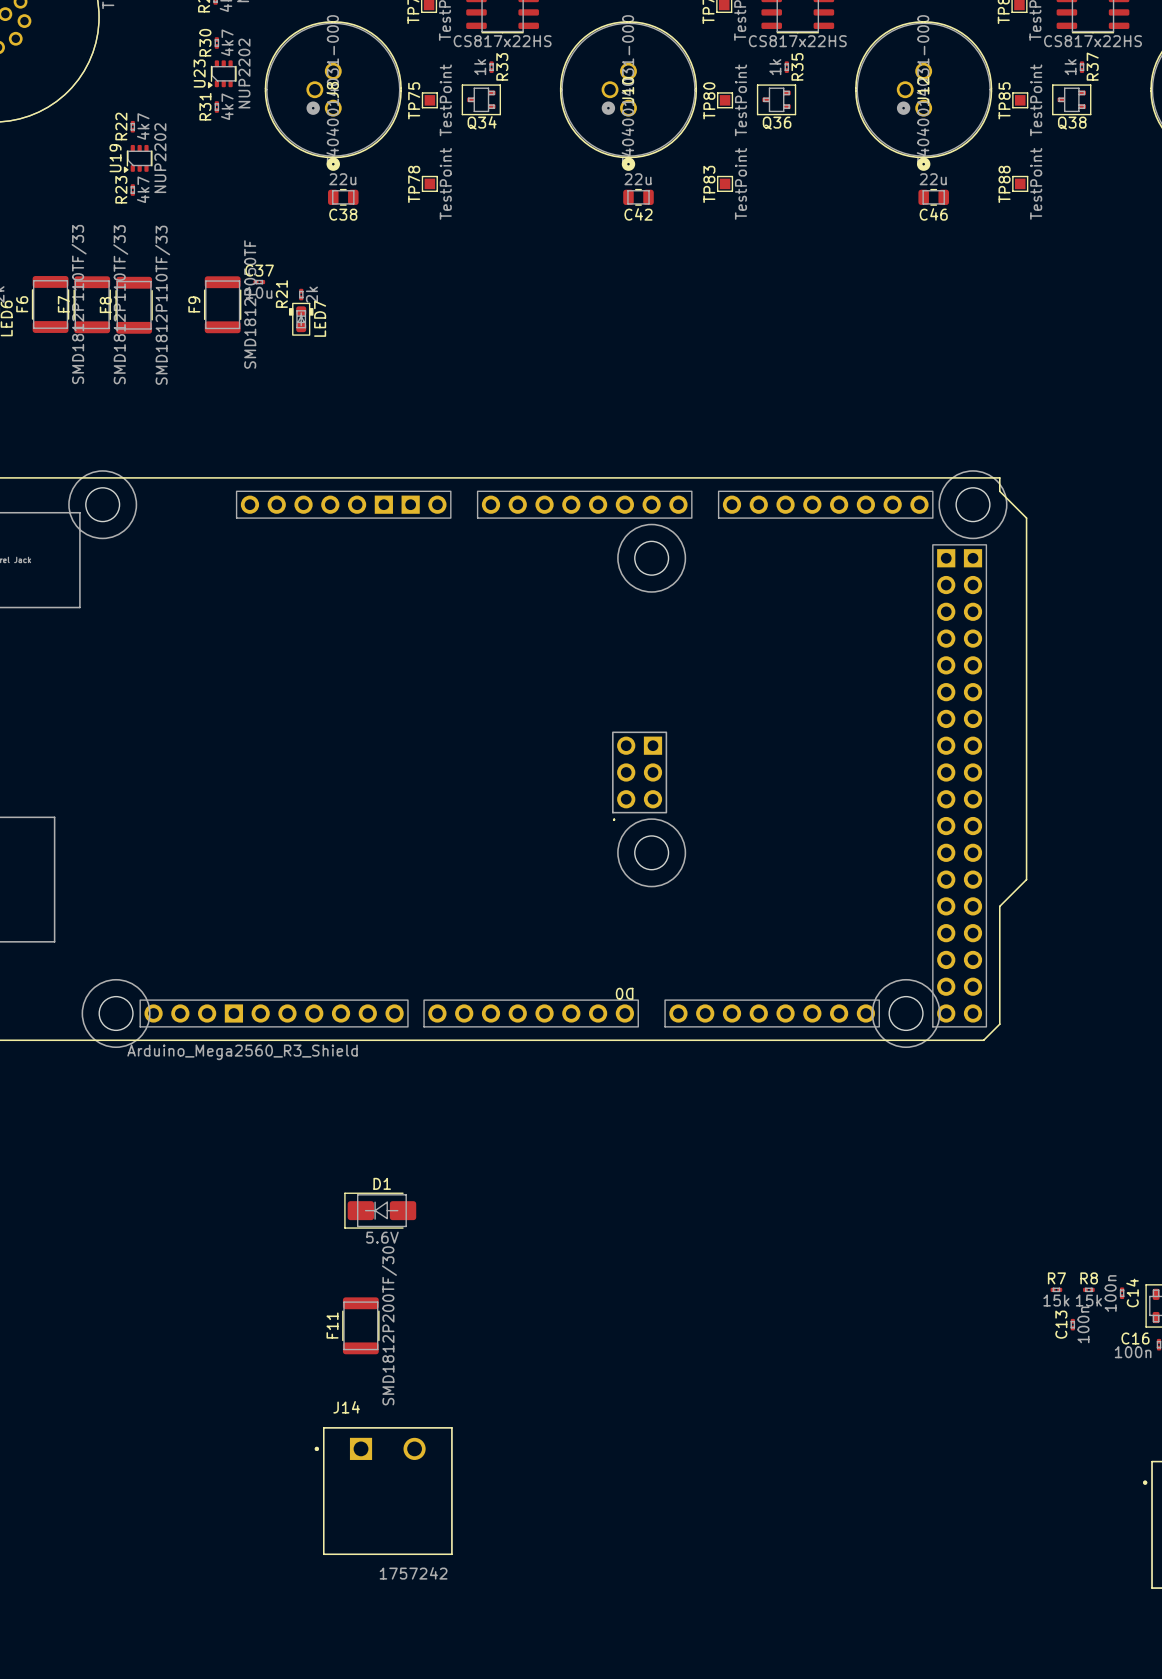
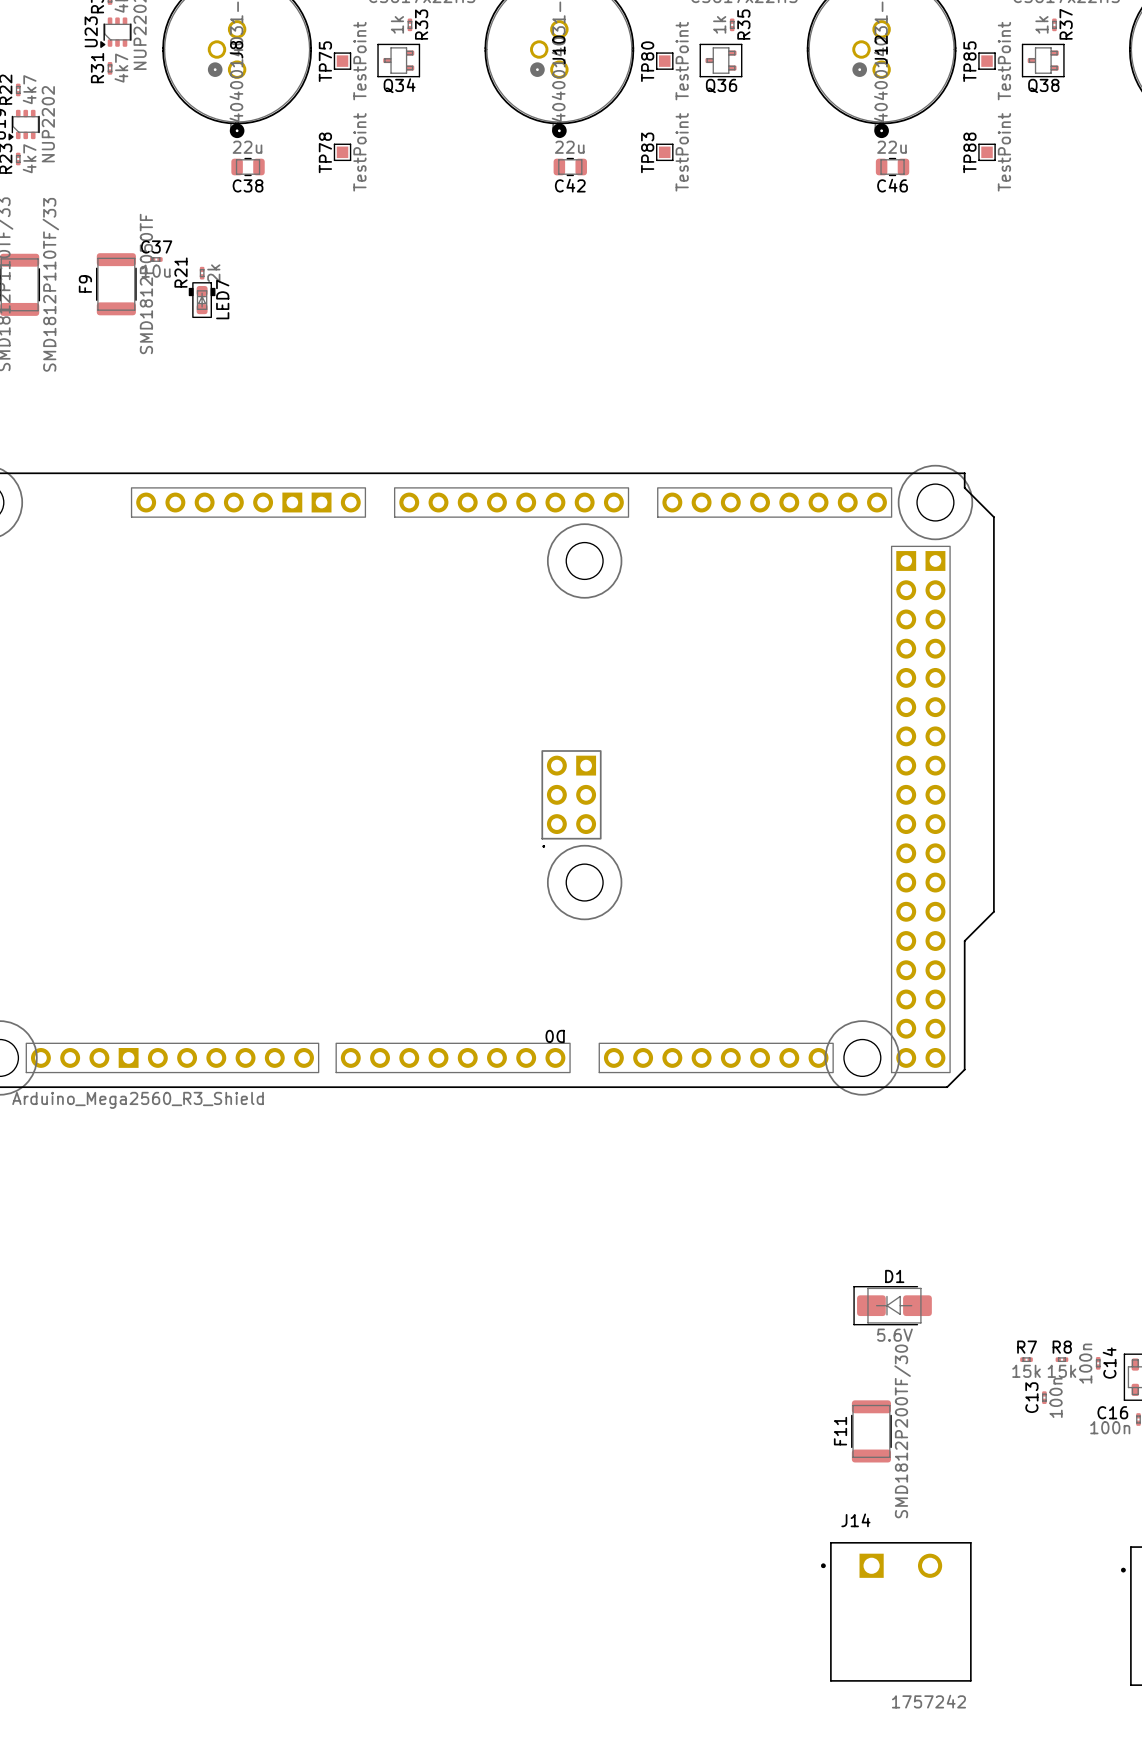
D1 position: (380, 1210) -> (892, 1305)
F11 position: (360, 1325) -> (871, 1431)
J14 position: (383, 1491) -> (896, 1611)

